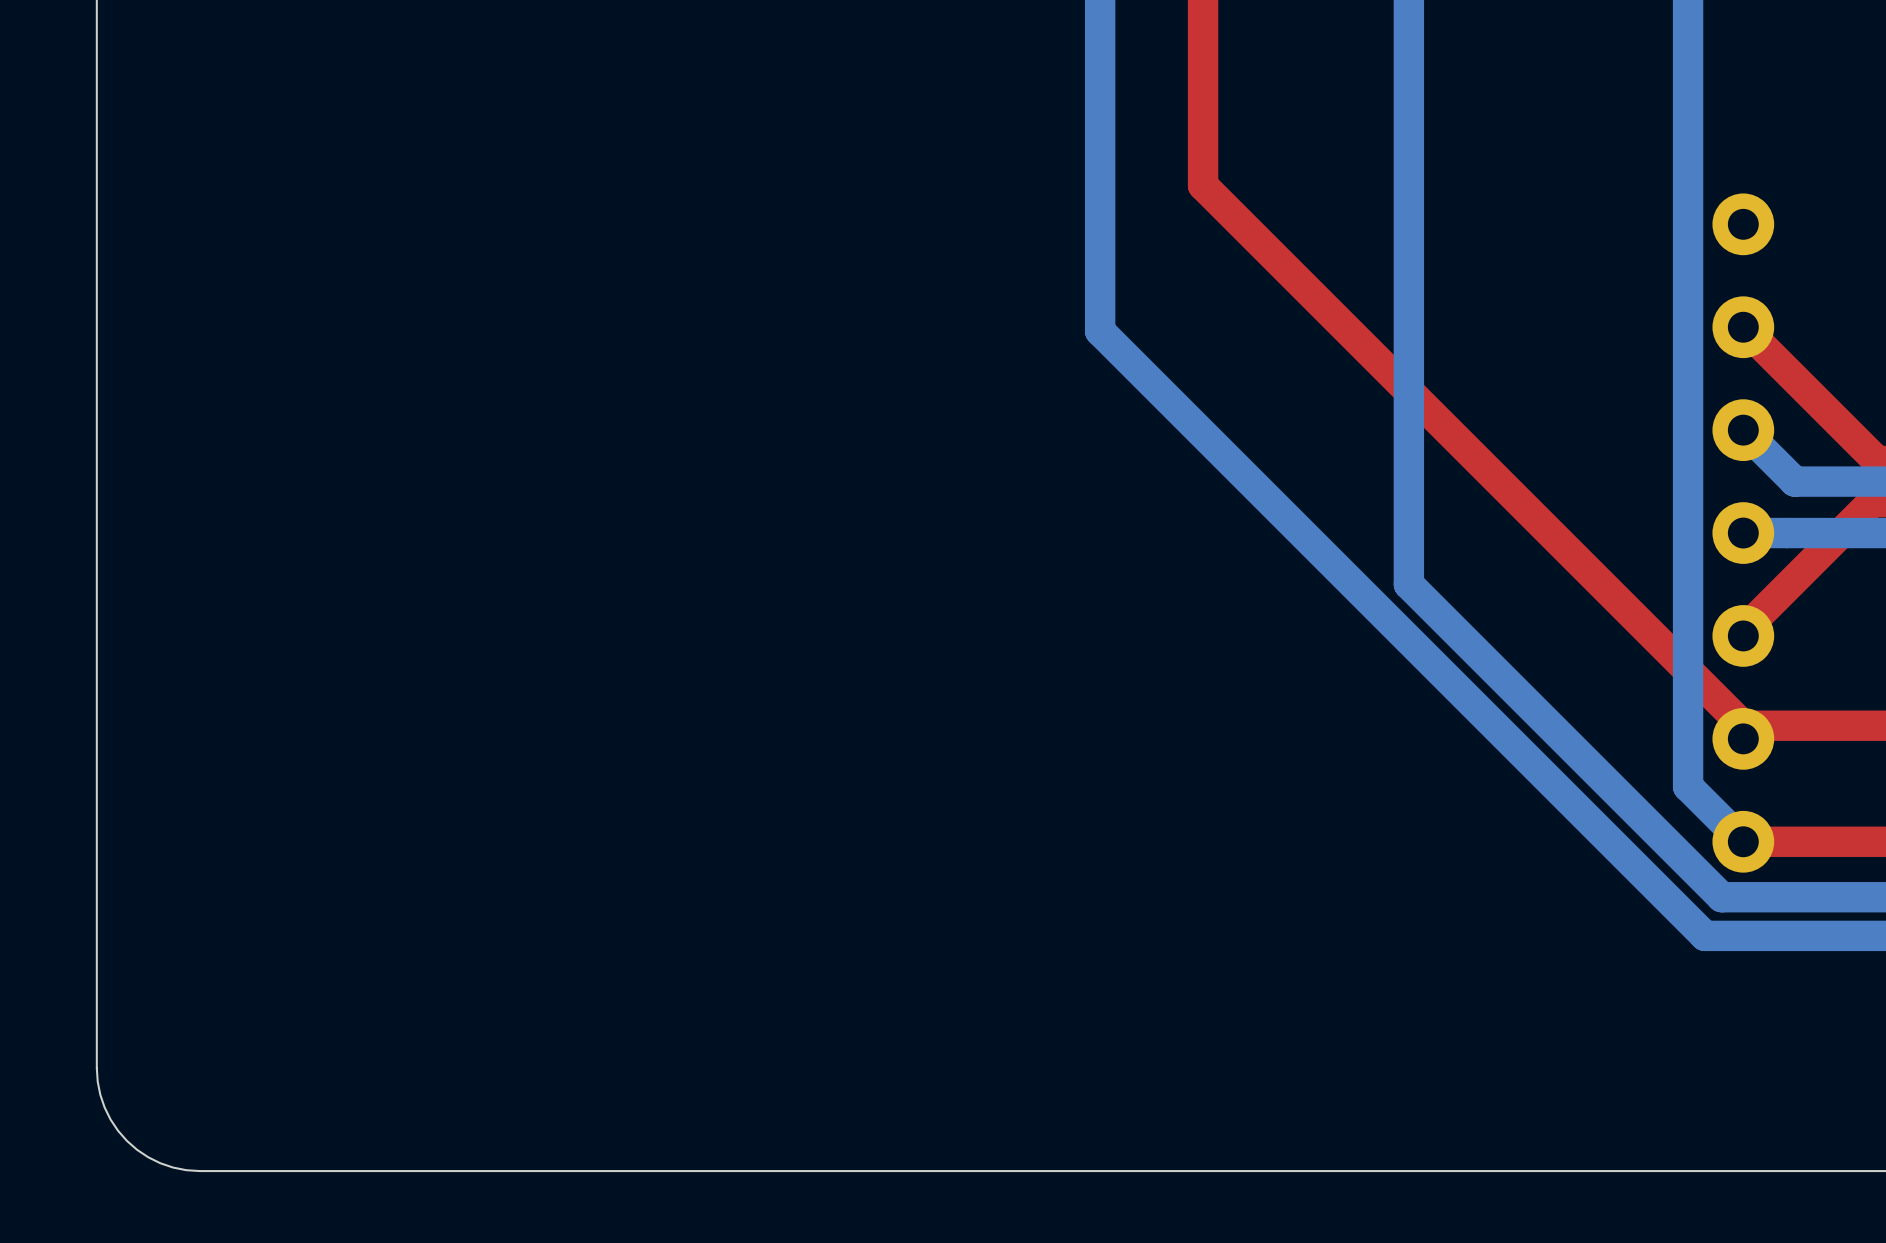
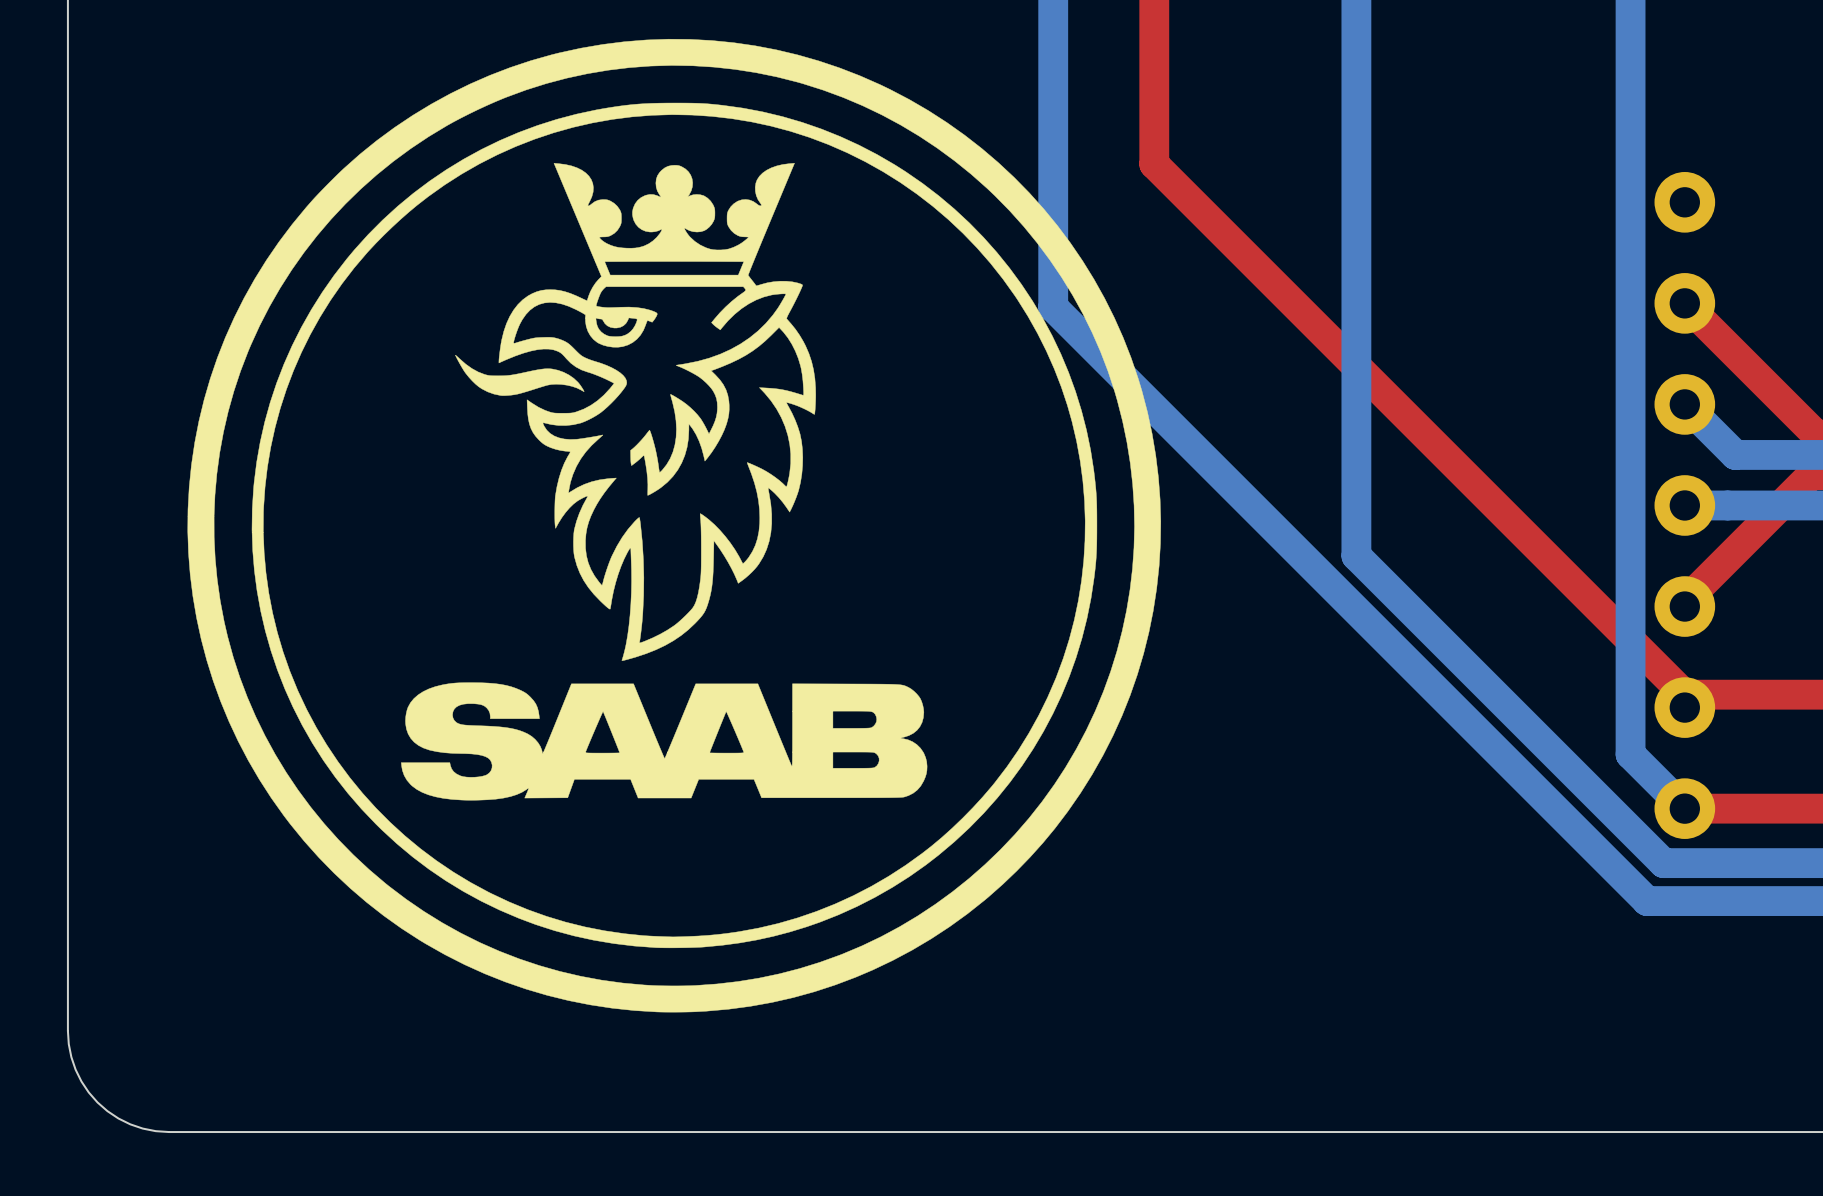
drawing: none -> [187, 38, 1161, 1013]

